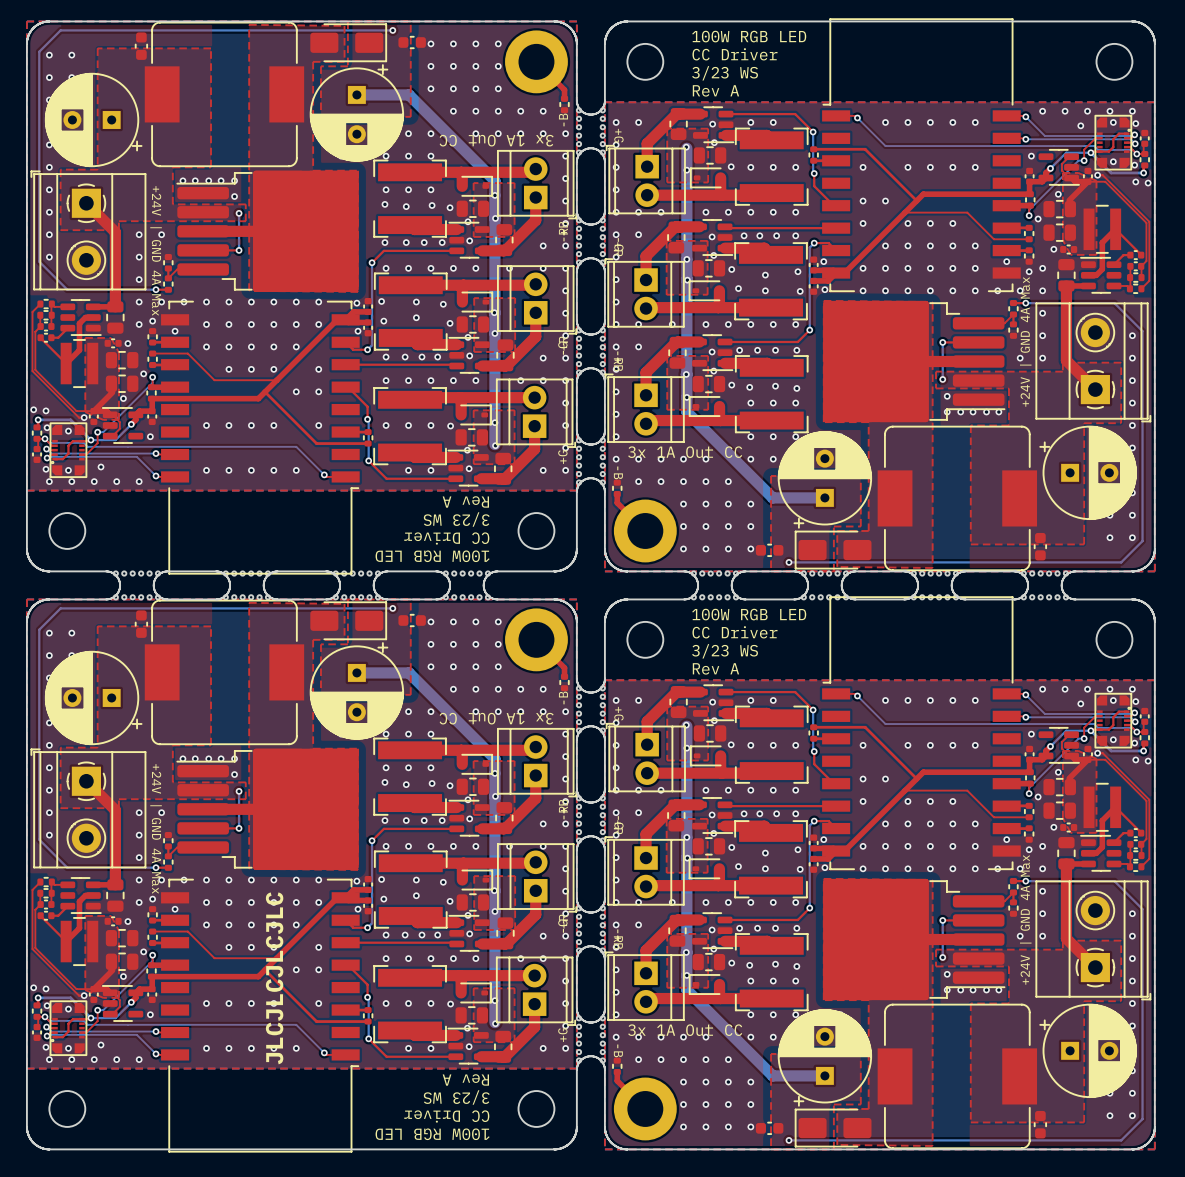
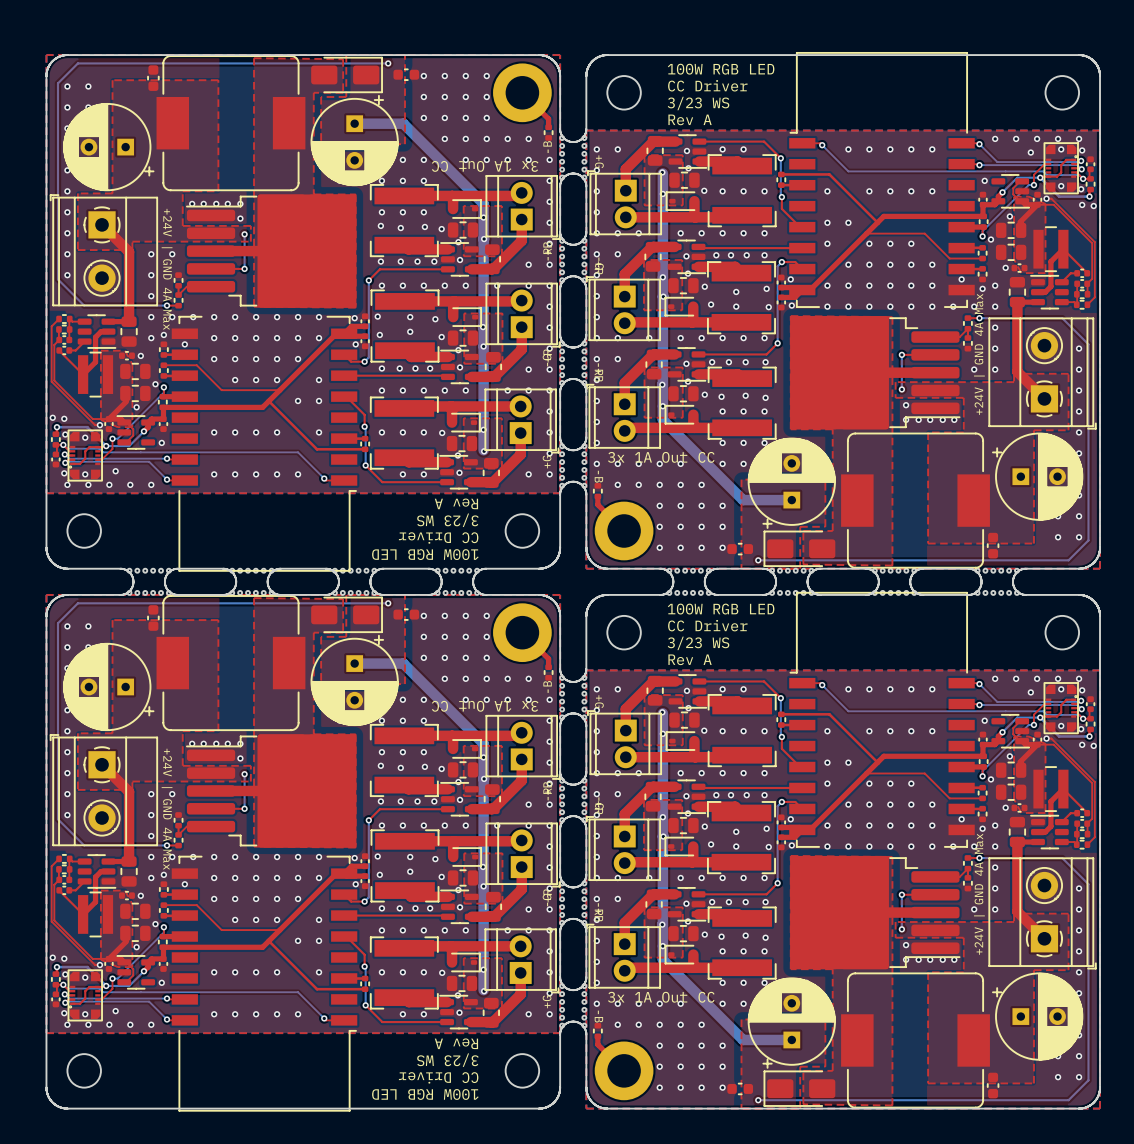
text: JLCJLCJLCJLC (274, 978) -> none

